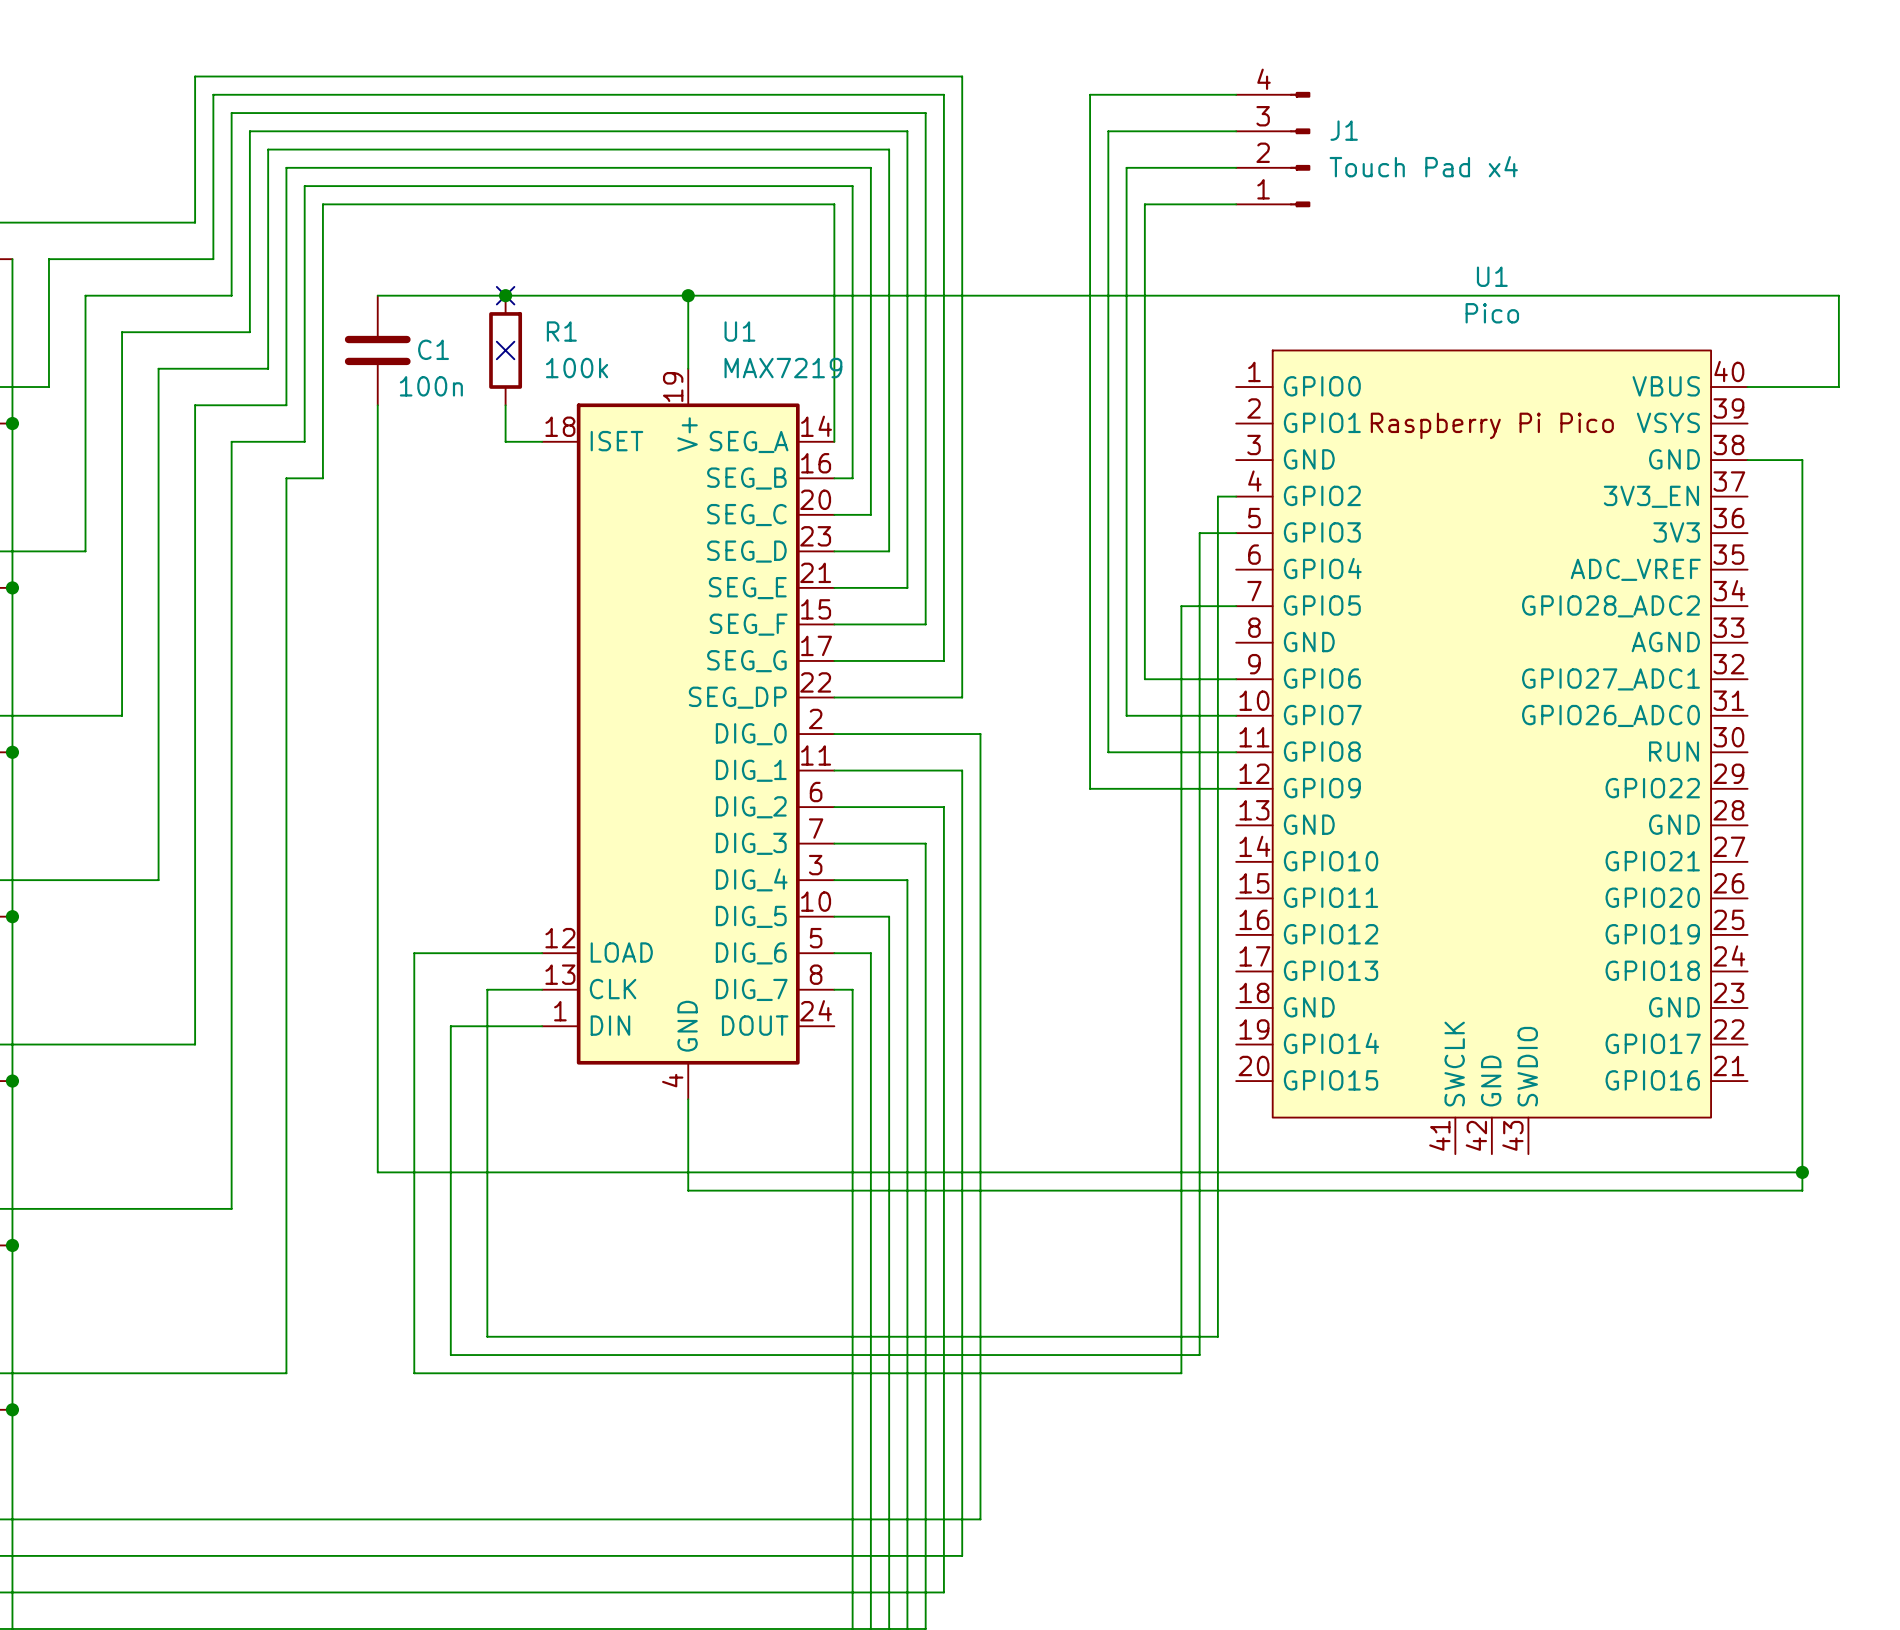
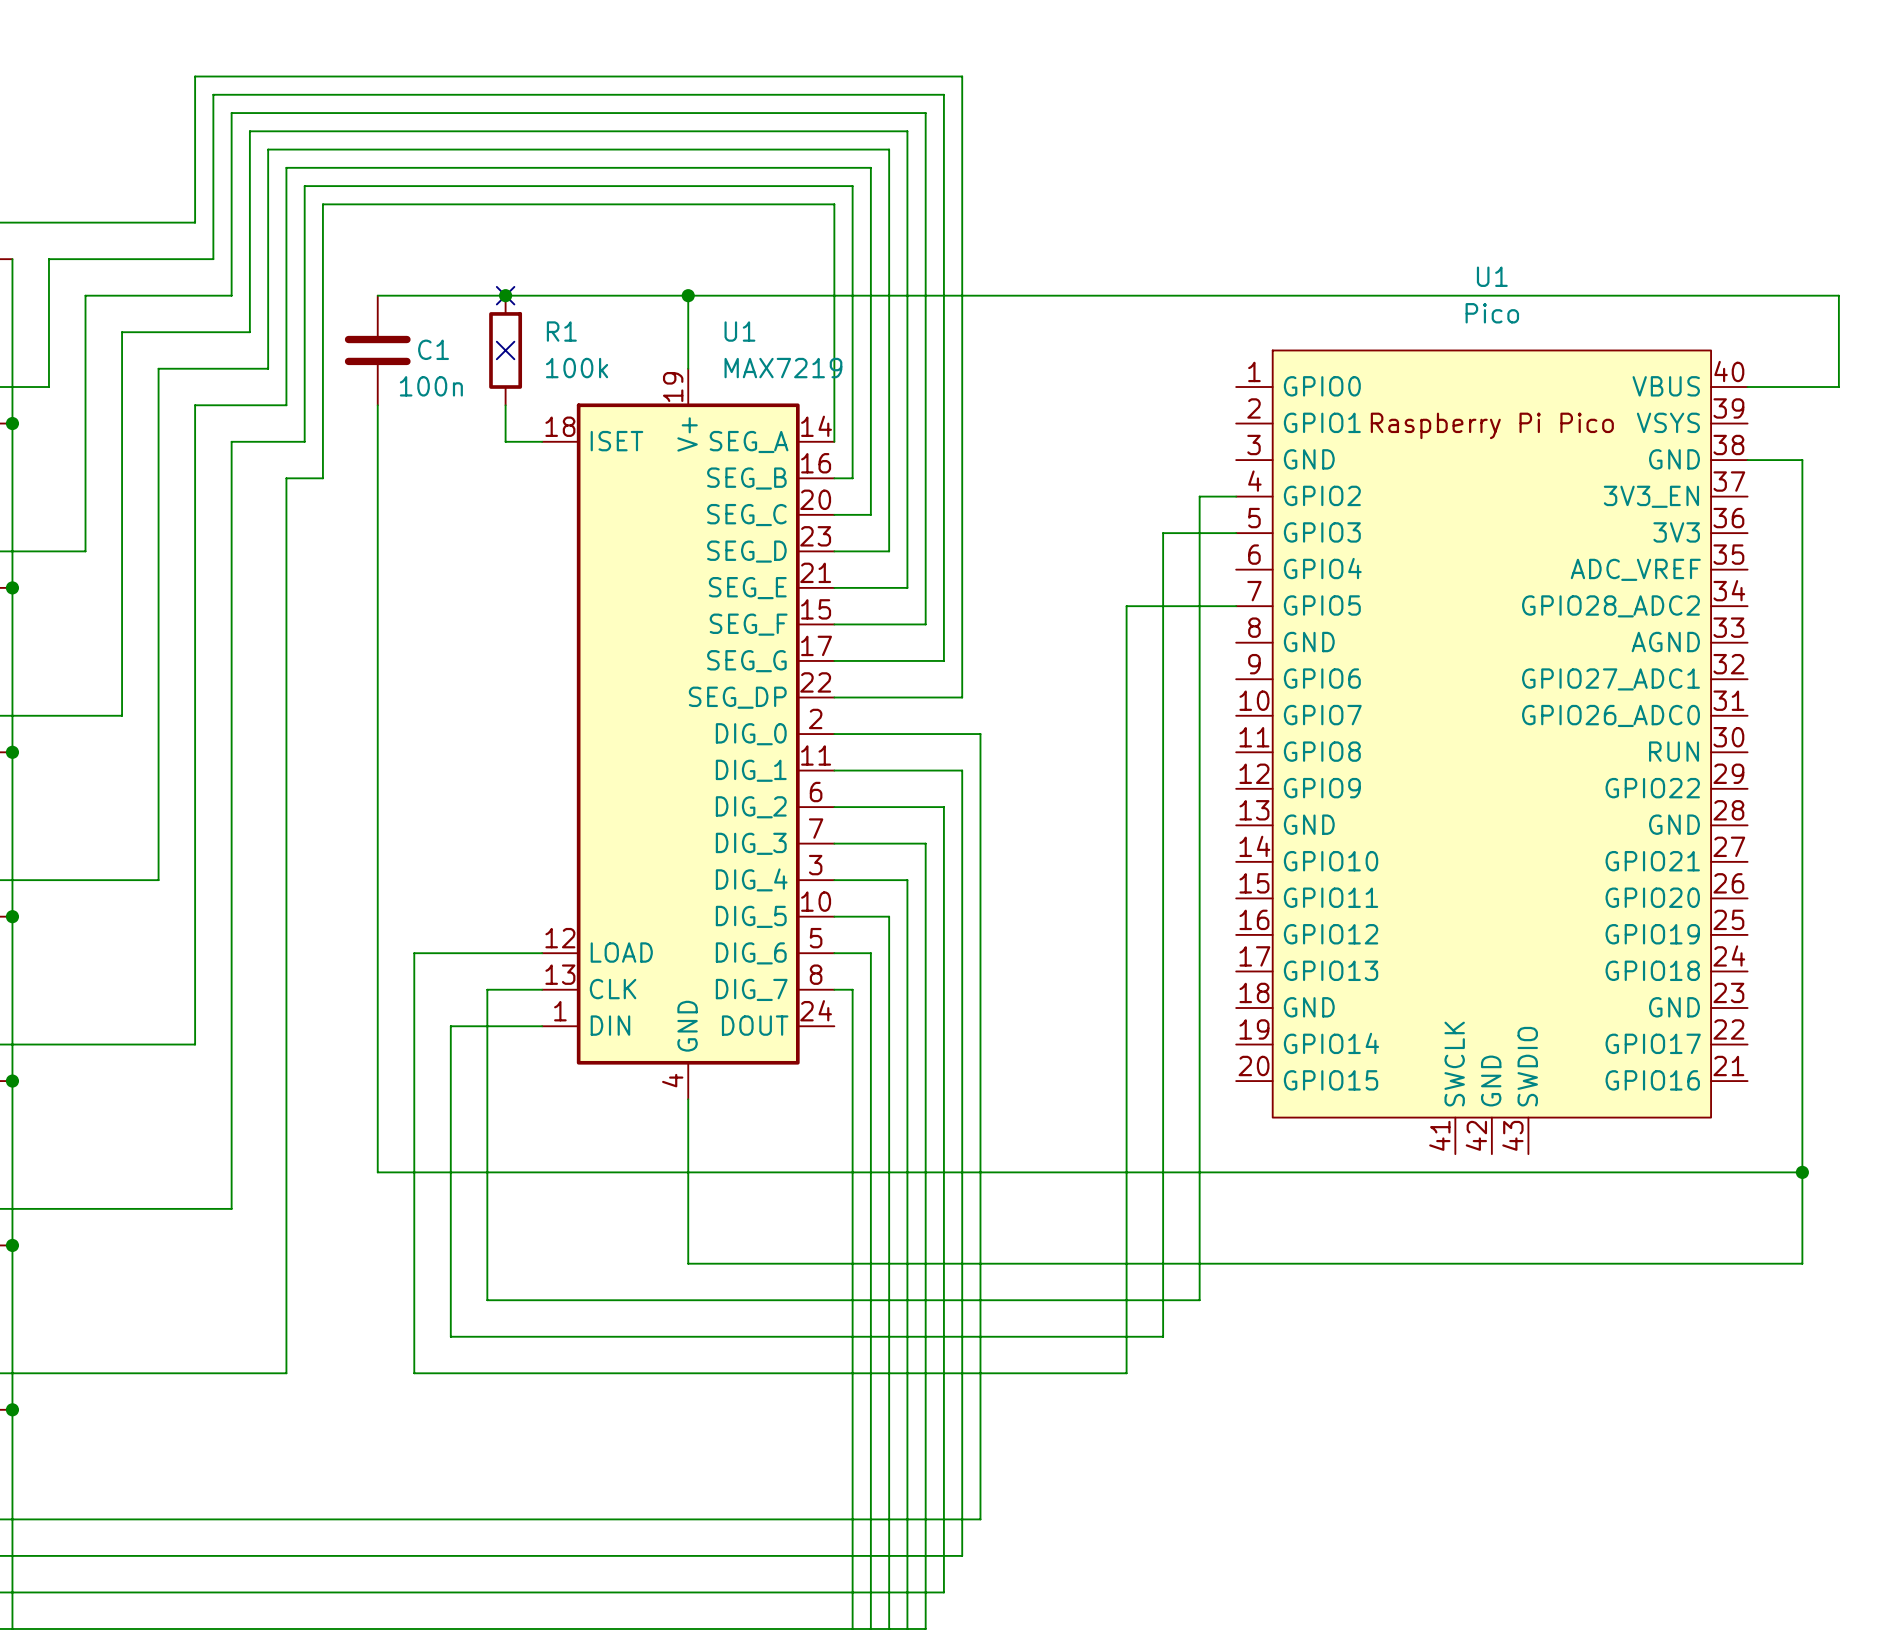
wire: (1236, 94) (1090, 94) (1090, 788) (1236, 788) -> none
wire: (1236, 131) (1108, 131) (1108, 752) (1236, 752) -> none
J1: Touch Pad x4 (1273, 149) -> none
wire: (1236, 167) (1126, 167) (1126, 606) -> (1181, 606) (1126, 606)
wire: (1236, 204) (1144, 204) (1144, 679) (1236, 679) -> none
wire: (1217, 496) (1217, 1336) (1163, 1336) -> (1217, 496) (1199, 496) (1199, 533) (1163, 533) (1163, 1336)
wire: (1181, 606) (1181, 1373) (1126, 1373) -> (1126, 715) (1126, 1373)
wire: (1126, 715) (1236, 715) -> none
wire: (688, 1190) (1802, 1190) -> (688, 1190) (688, 1263) (1802, 1263) (1802, 1190)
wire: (487, 1300) (487, 1336) -> (450, 1336) (487, 1336)
wire: (1199, 1300) (1199, 1355) (450, 1355) (450, 1336) -> (1199, 1300) (487, 1300)

